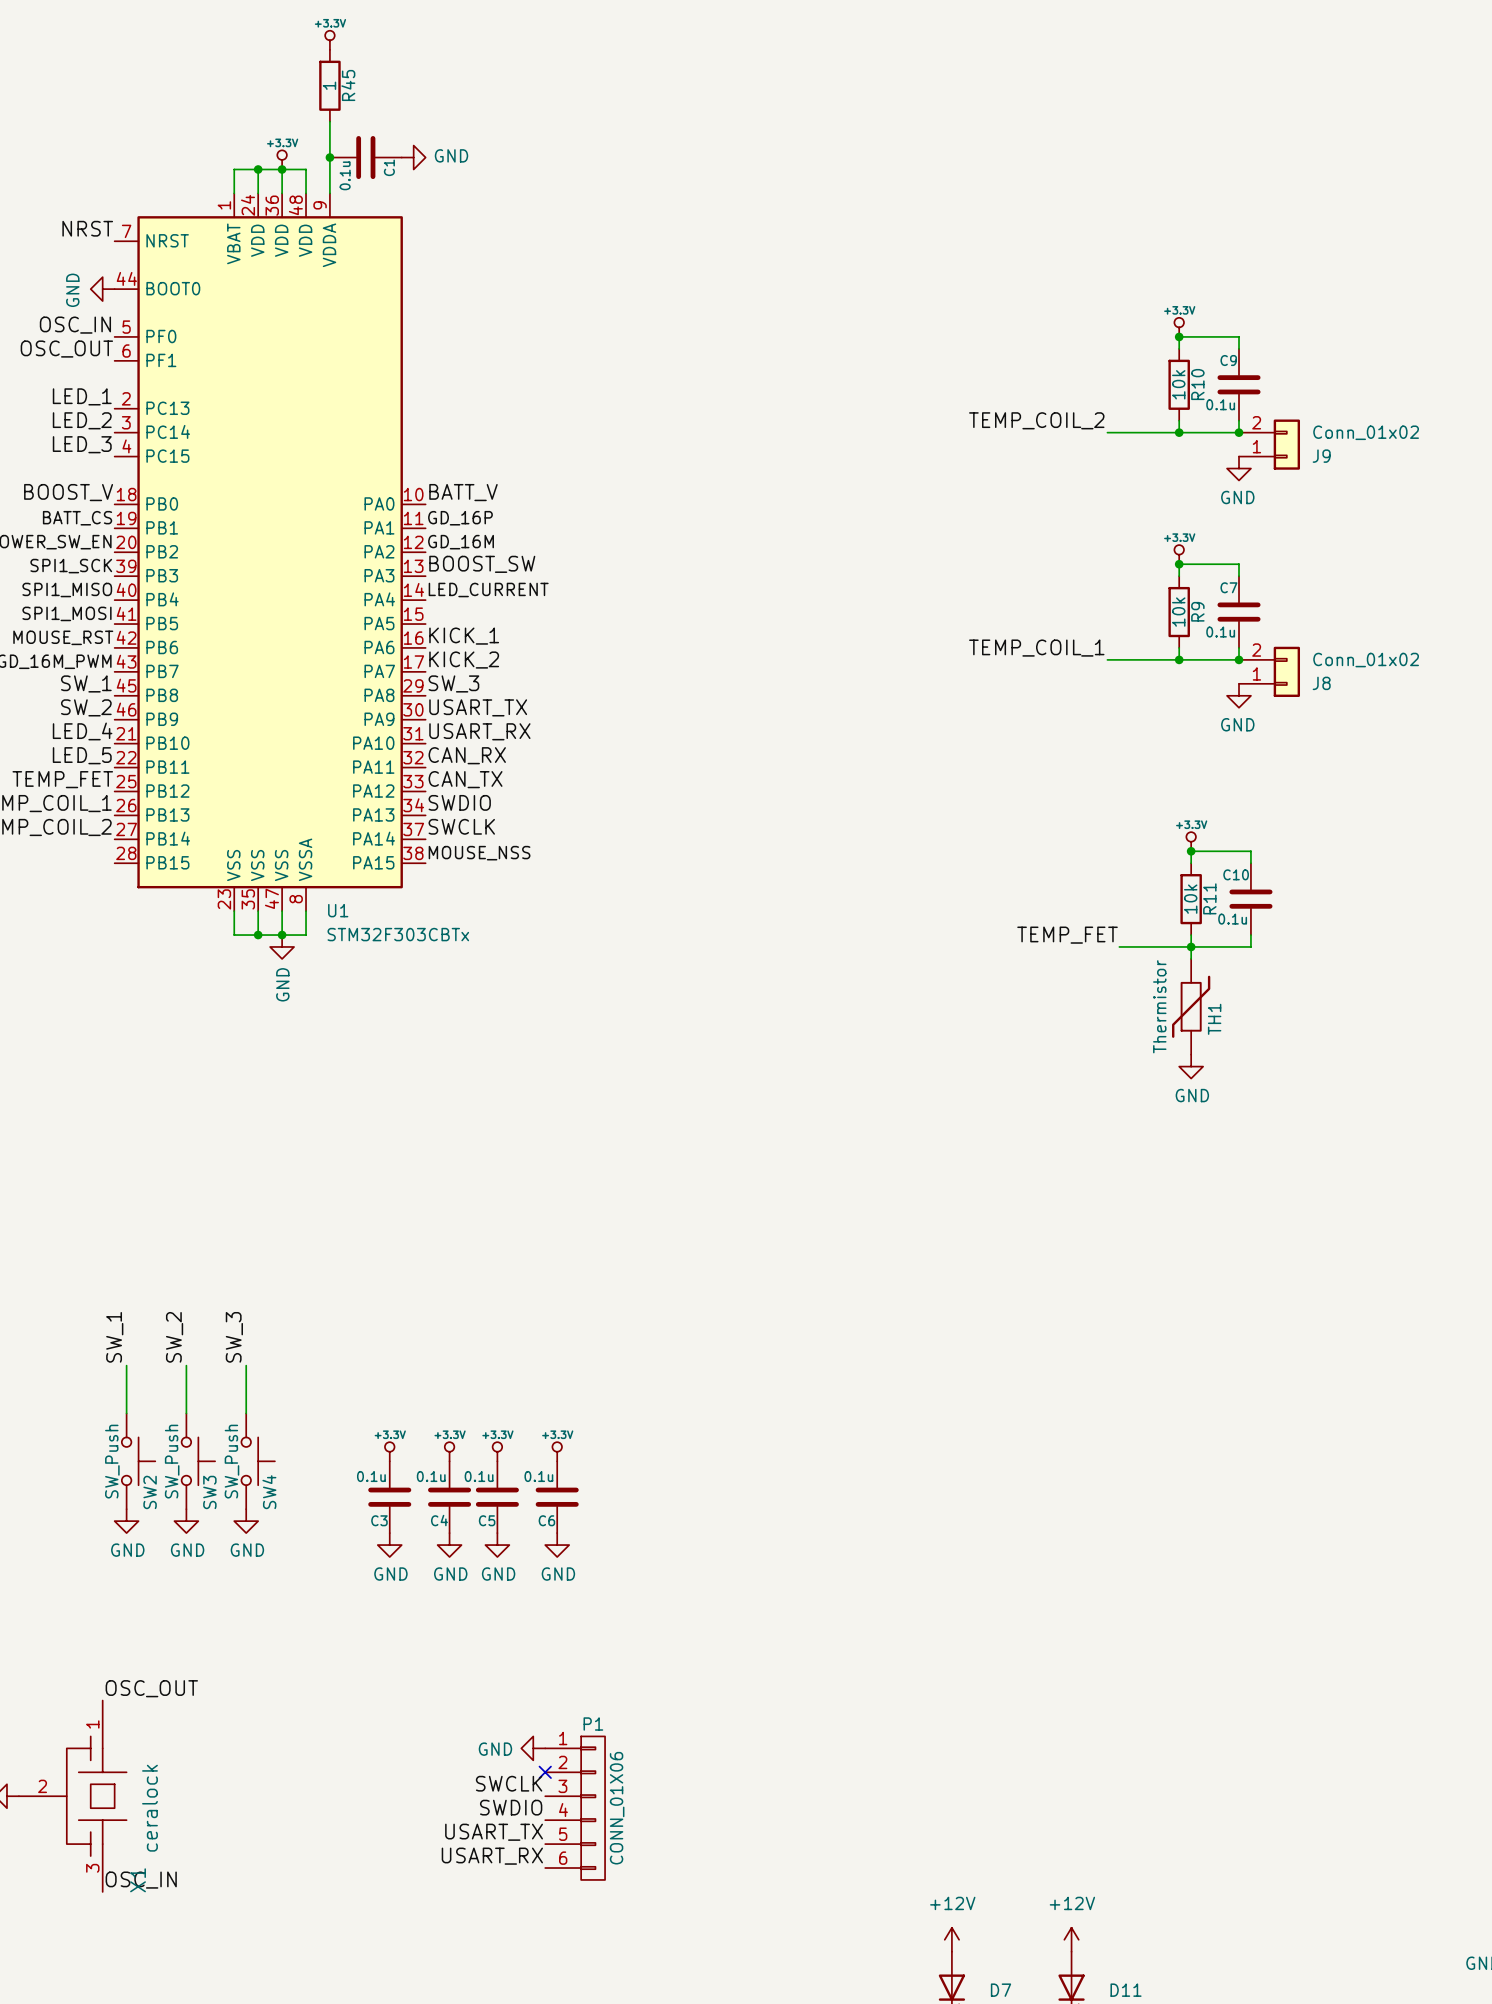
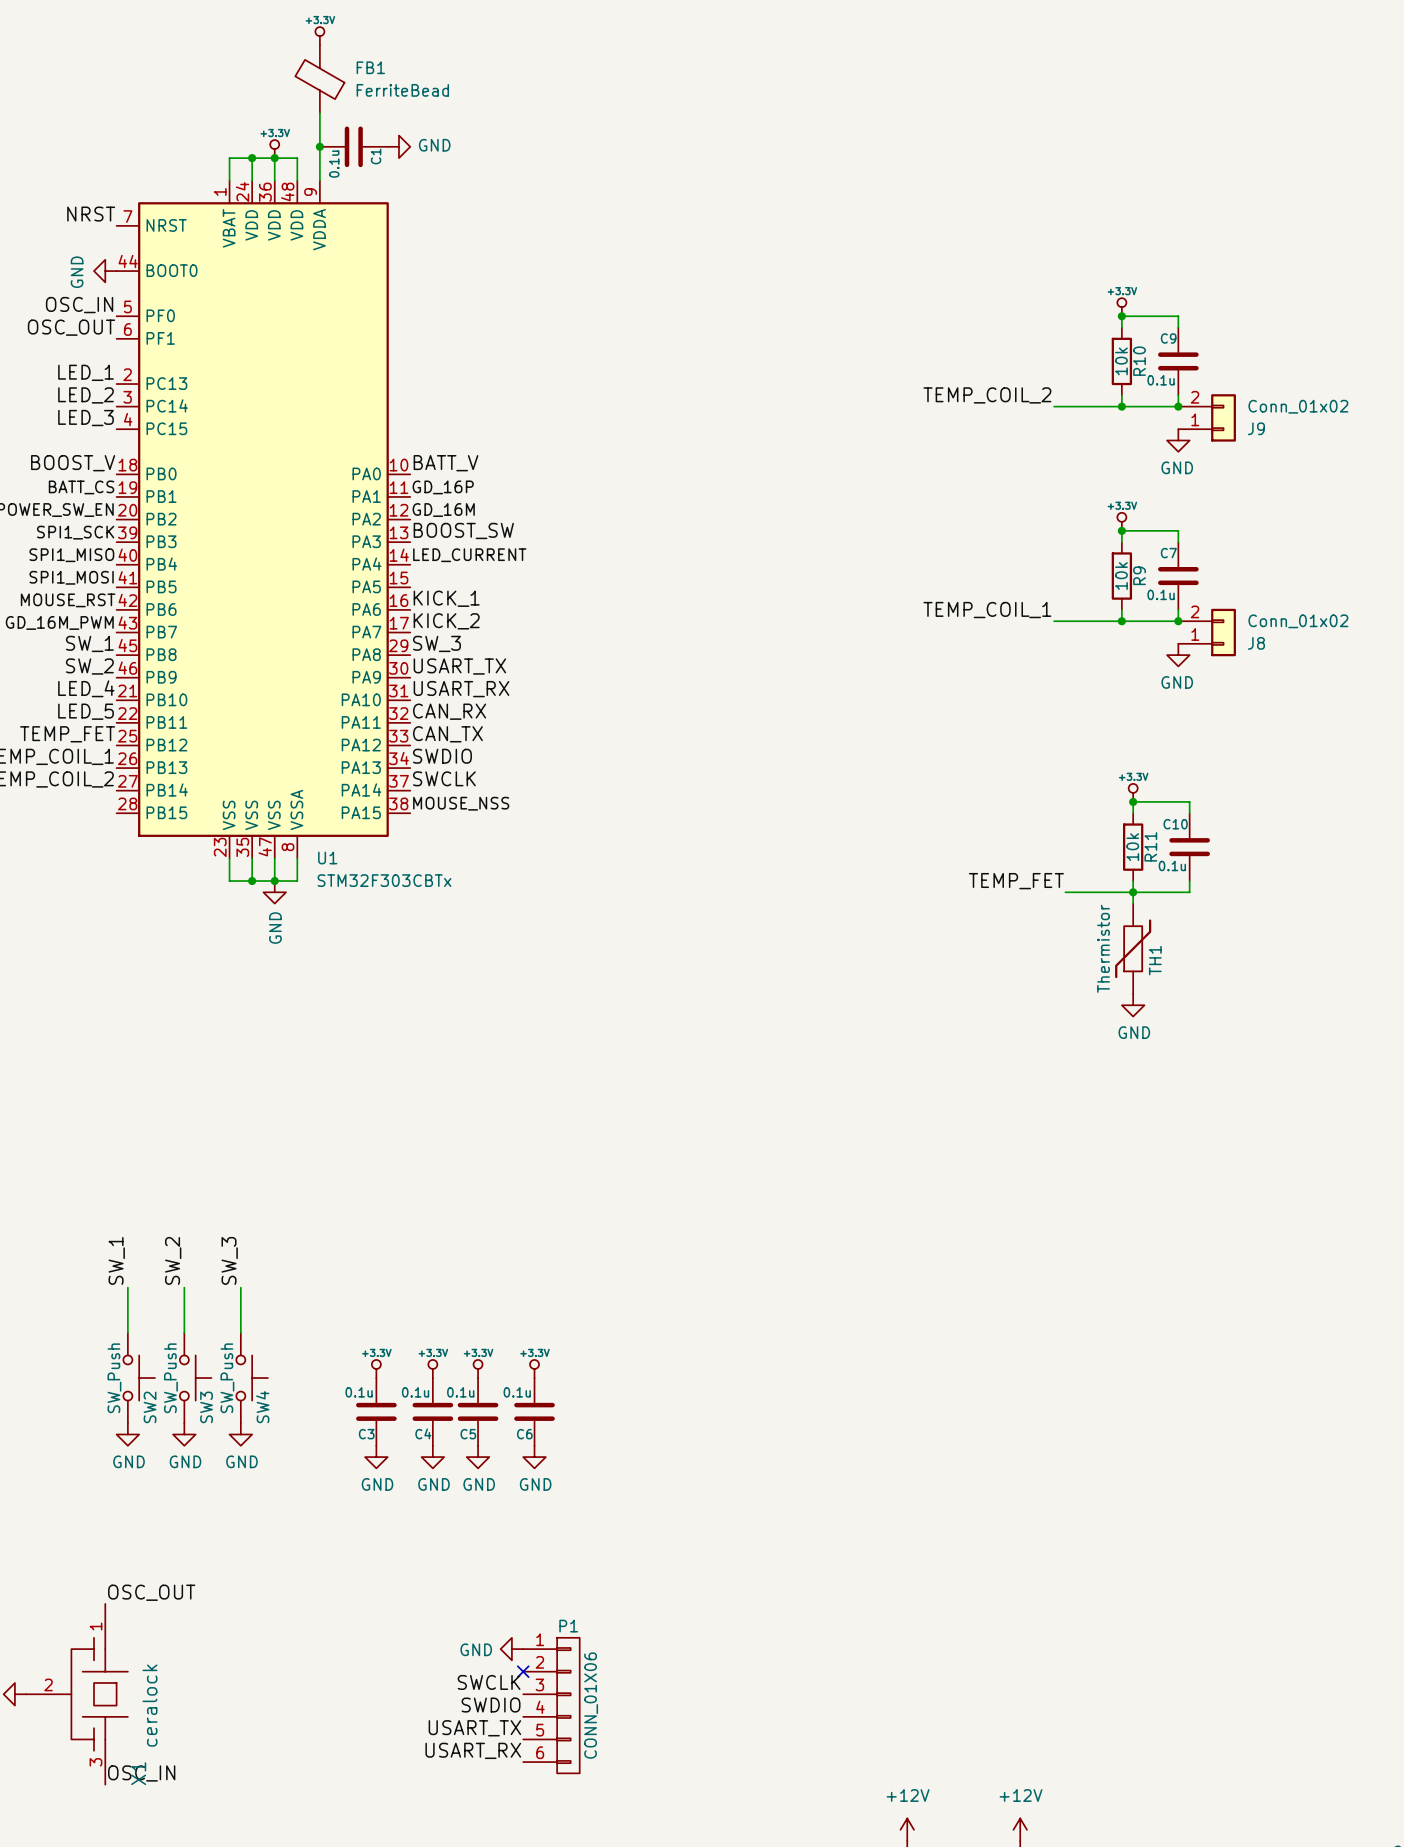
R45: 1 (329, 85) -> none
FB1: none -> FerriteBead (319, 79)

